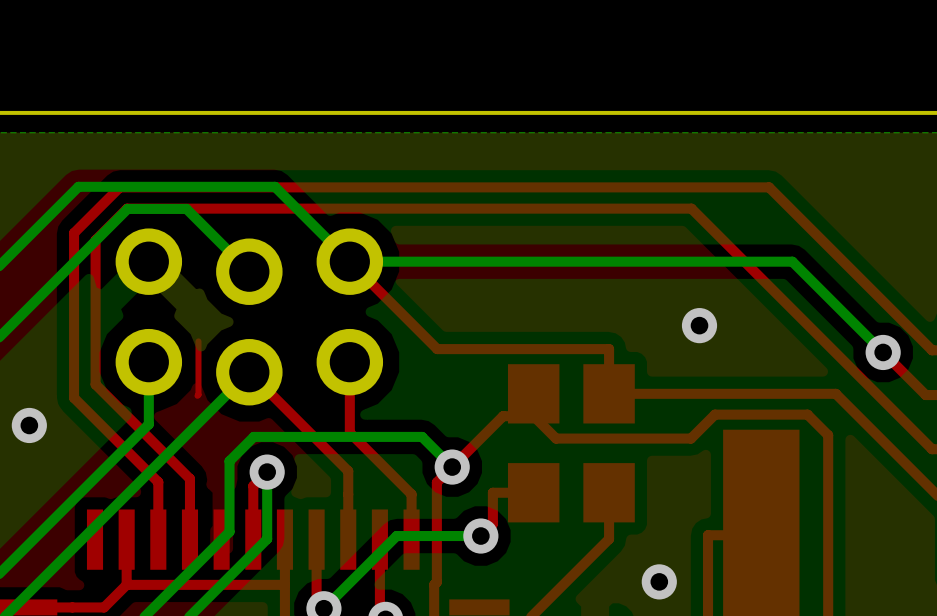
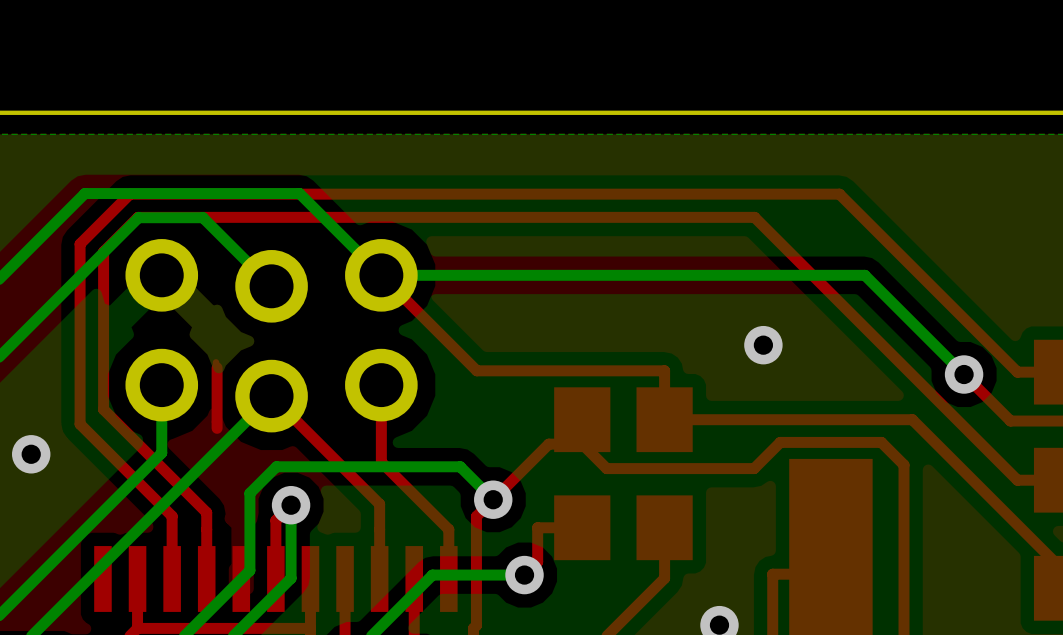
top track: none -> (217, 367) (217, 428)

